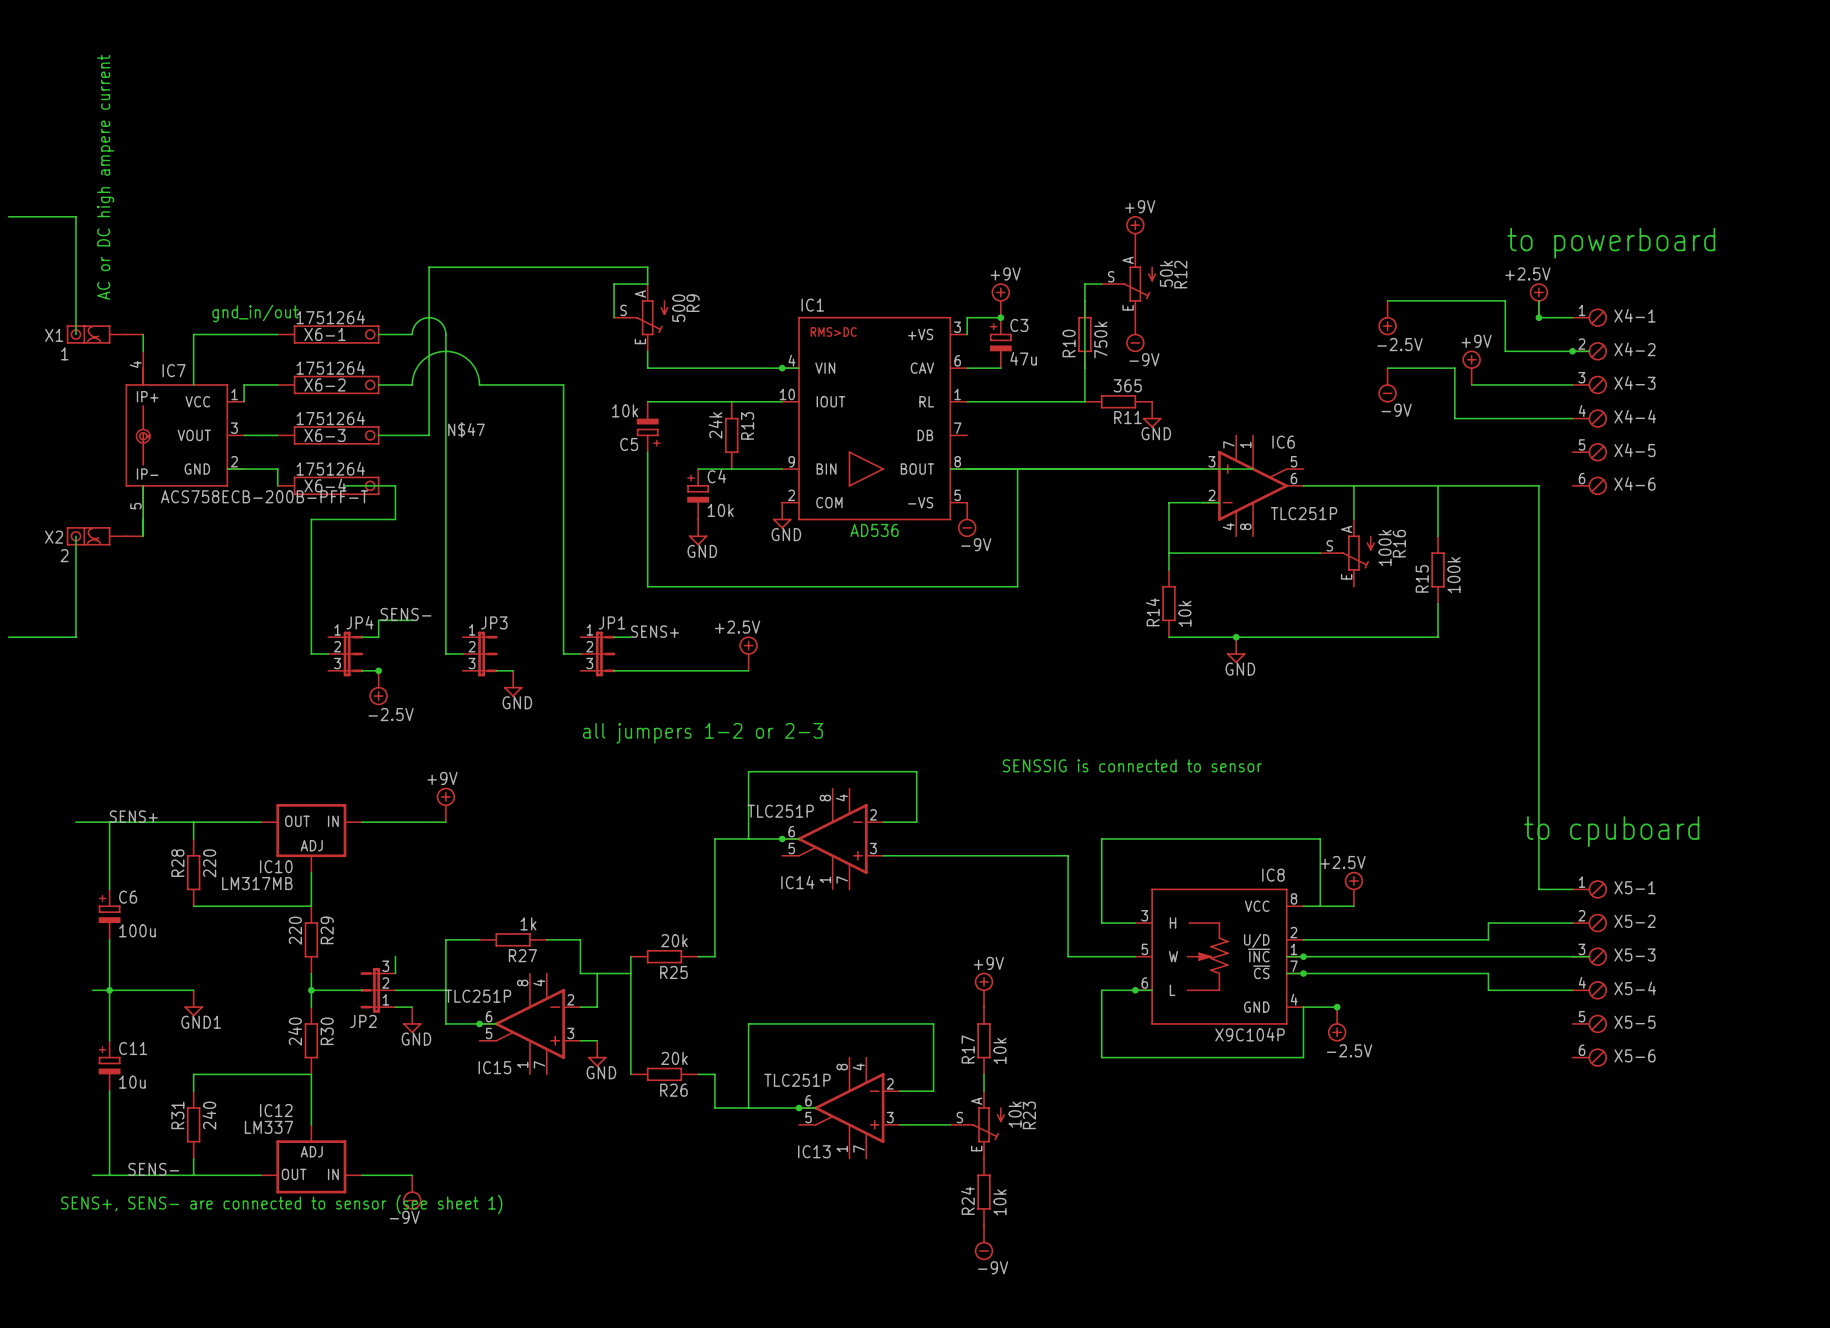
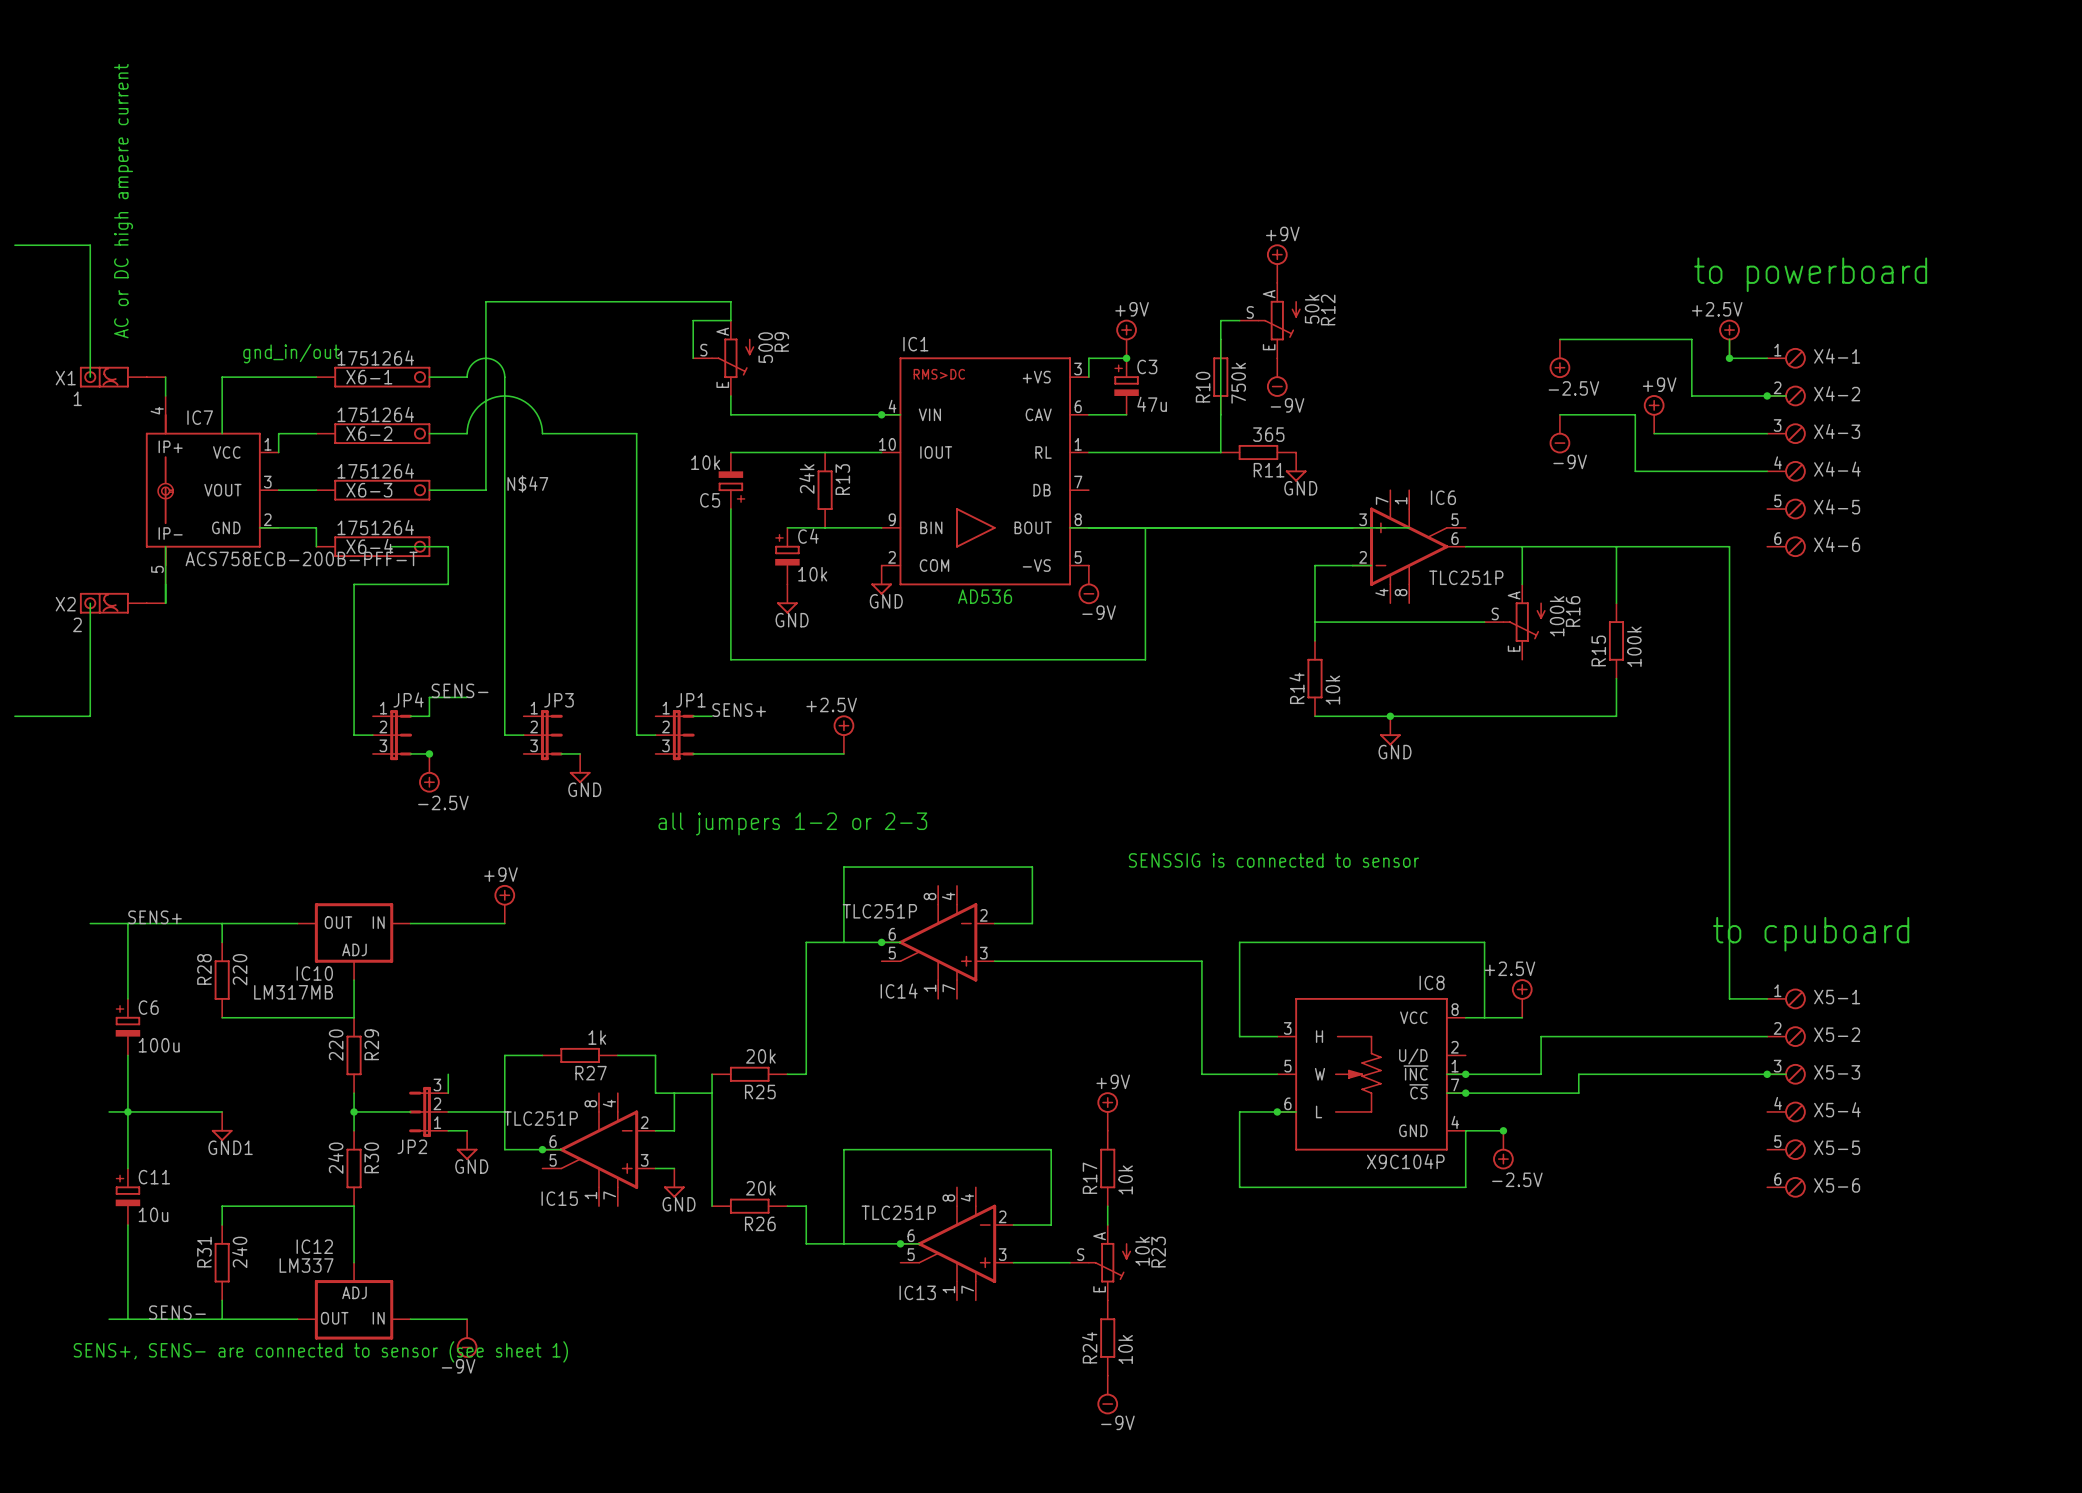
wire: (1488, 923) (1488, 939) (1303, 939) -> (1672, 1036) (1541, 1036) (1541, 1074)
wire: (1370, 956) (1404, 956) -> (1578, 1093) (1578, 1074)
junction: none -> (1767, 1074)
wire: (1404, 973) (1488, 973) (1488, 990) (1572, 990) -> none

